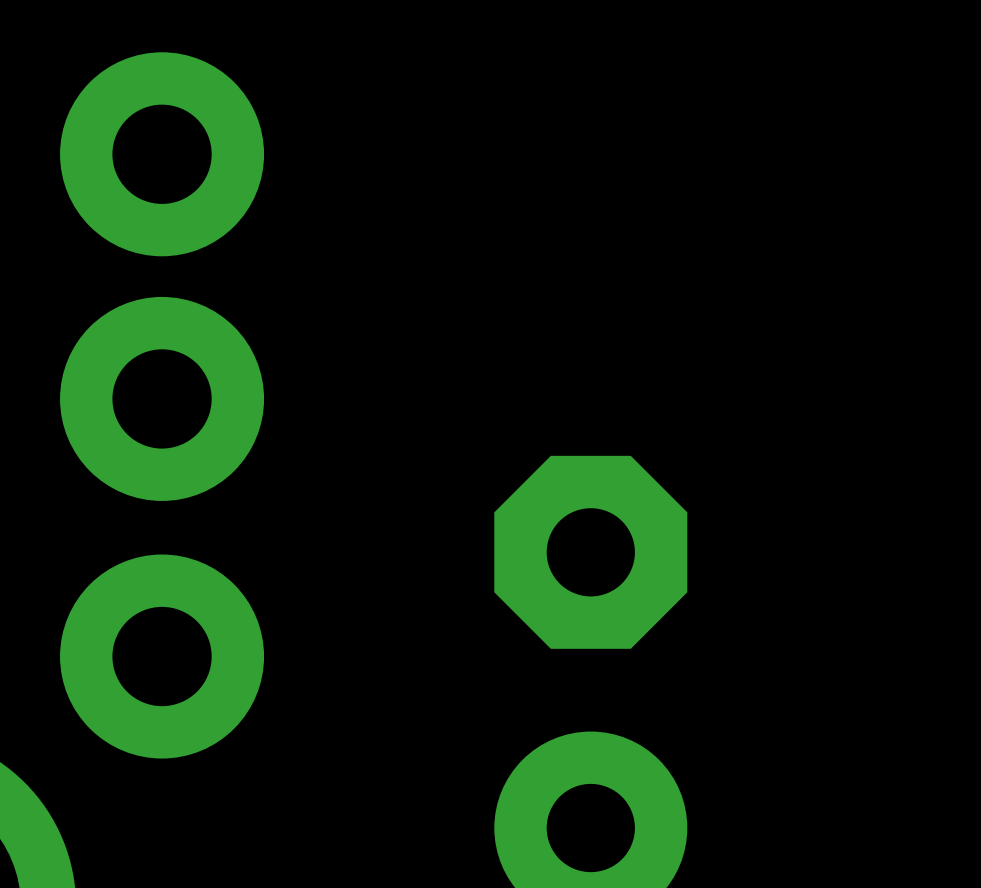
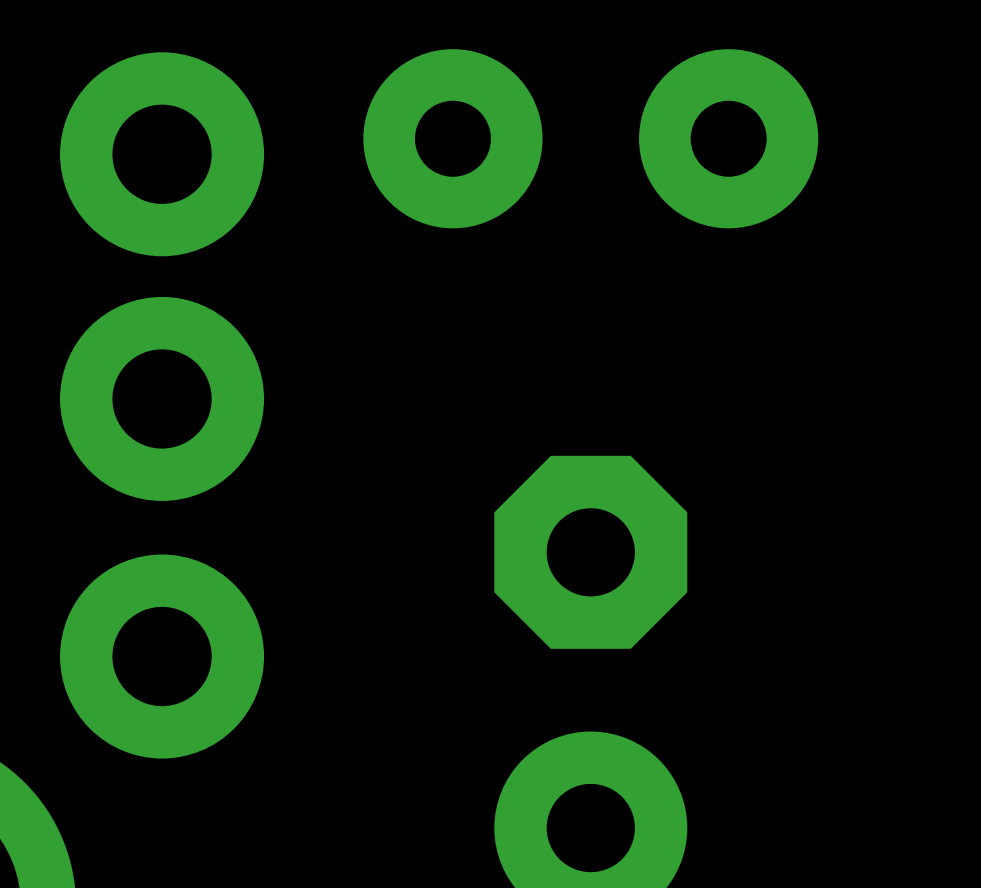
part: none -> (590, 138)

